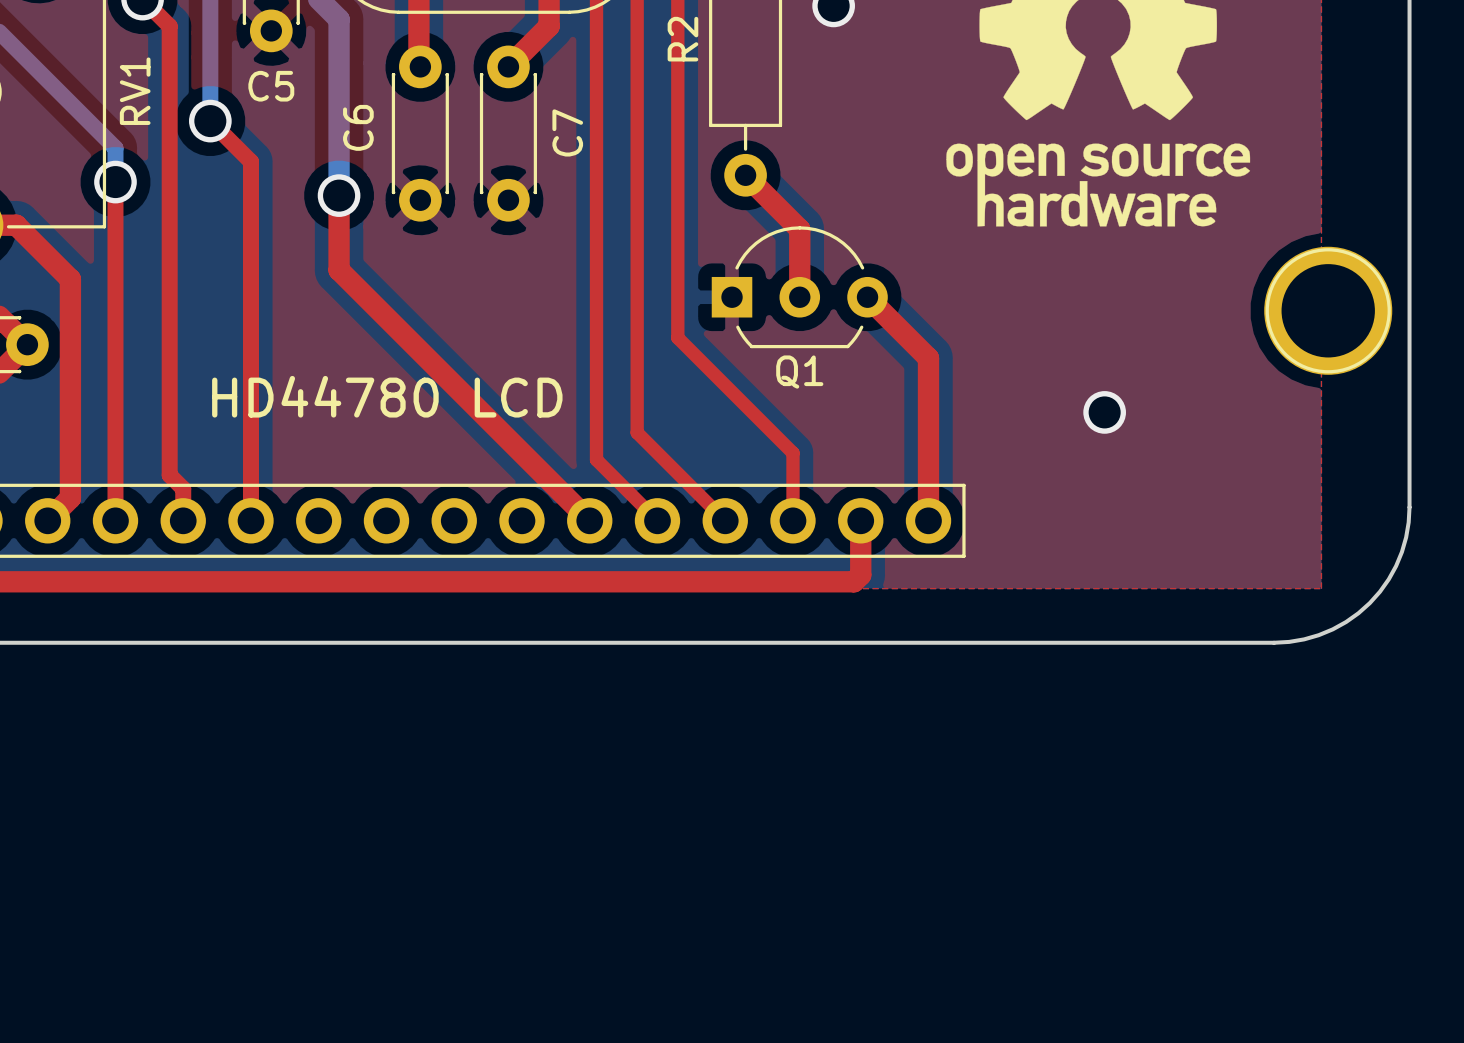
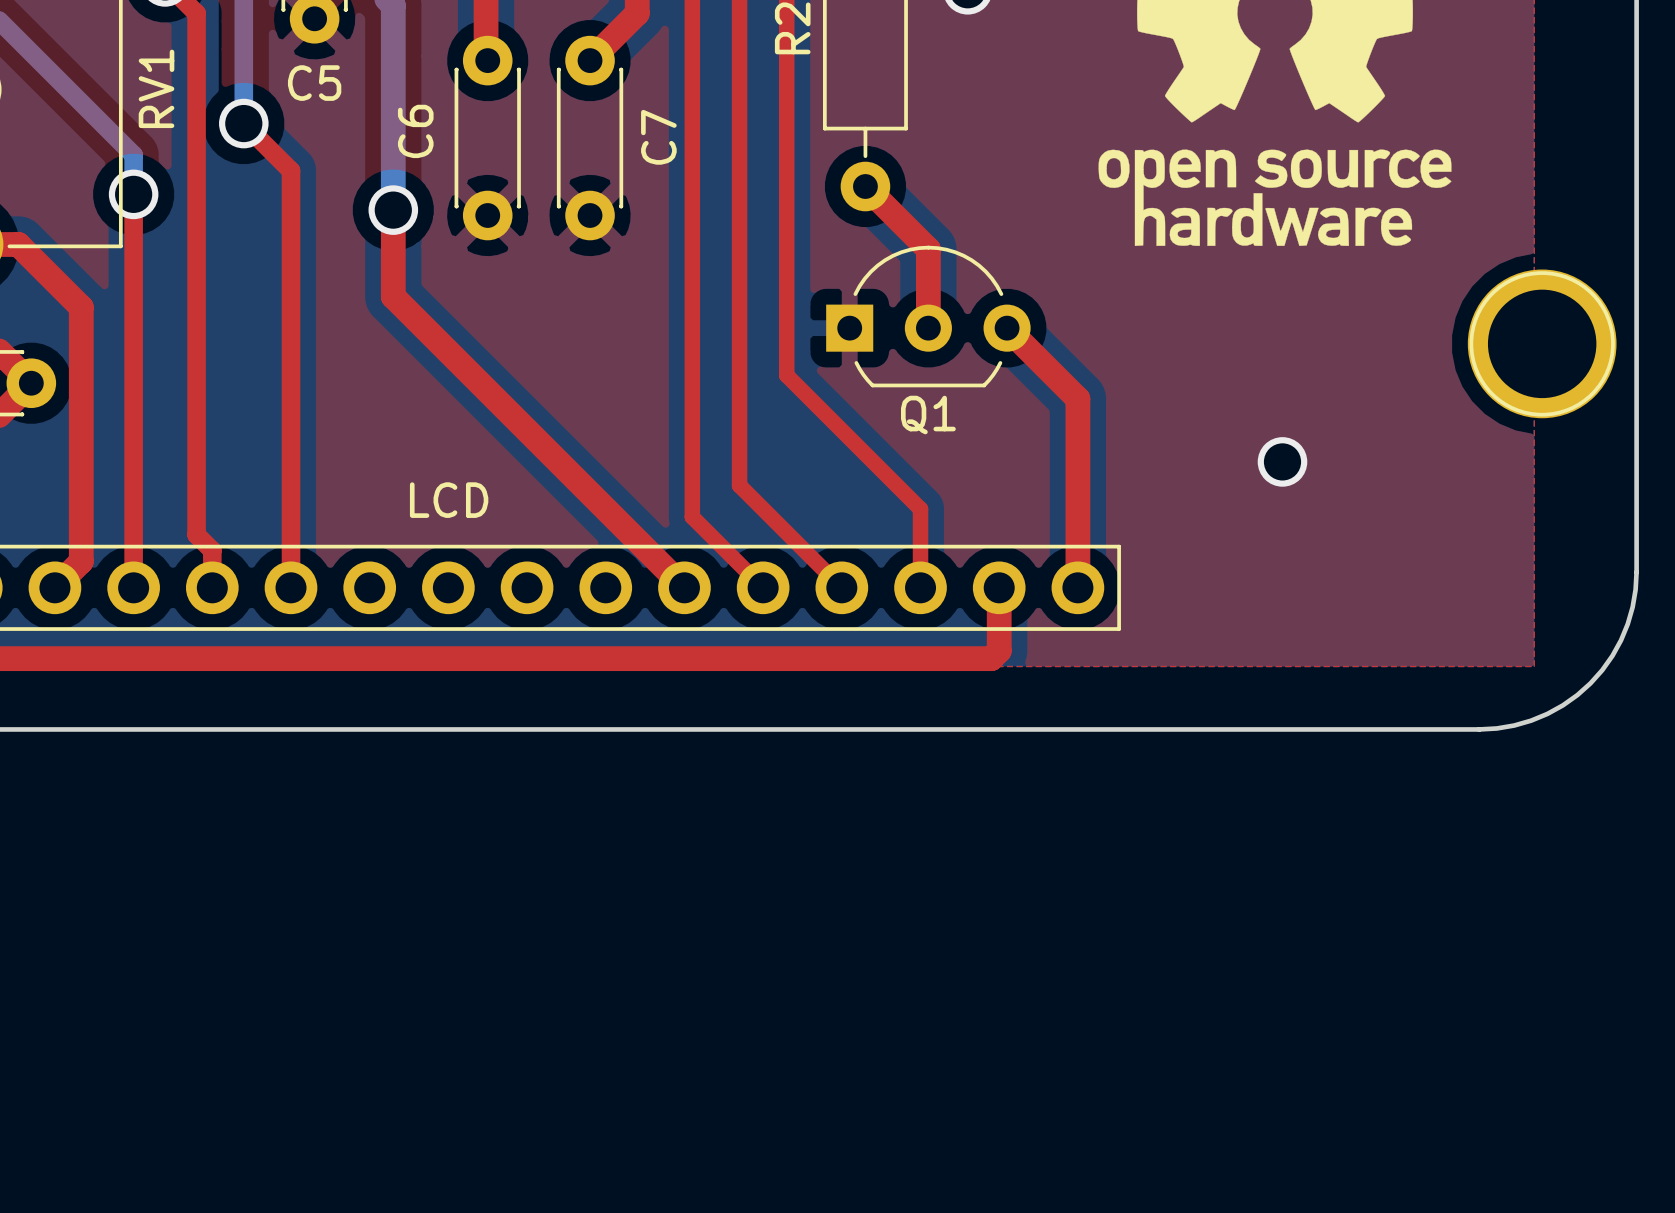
text: HD44780 LCD (387, 396) -> none
text: none -> LCD (449, 500)

